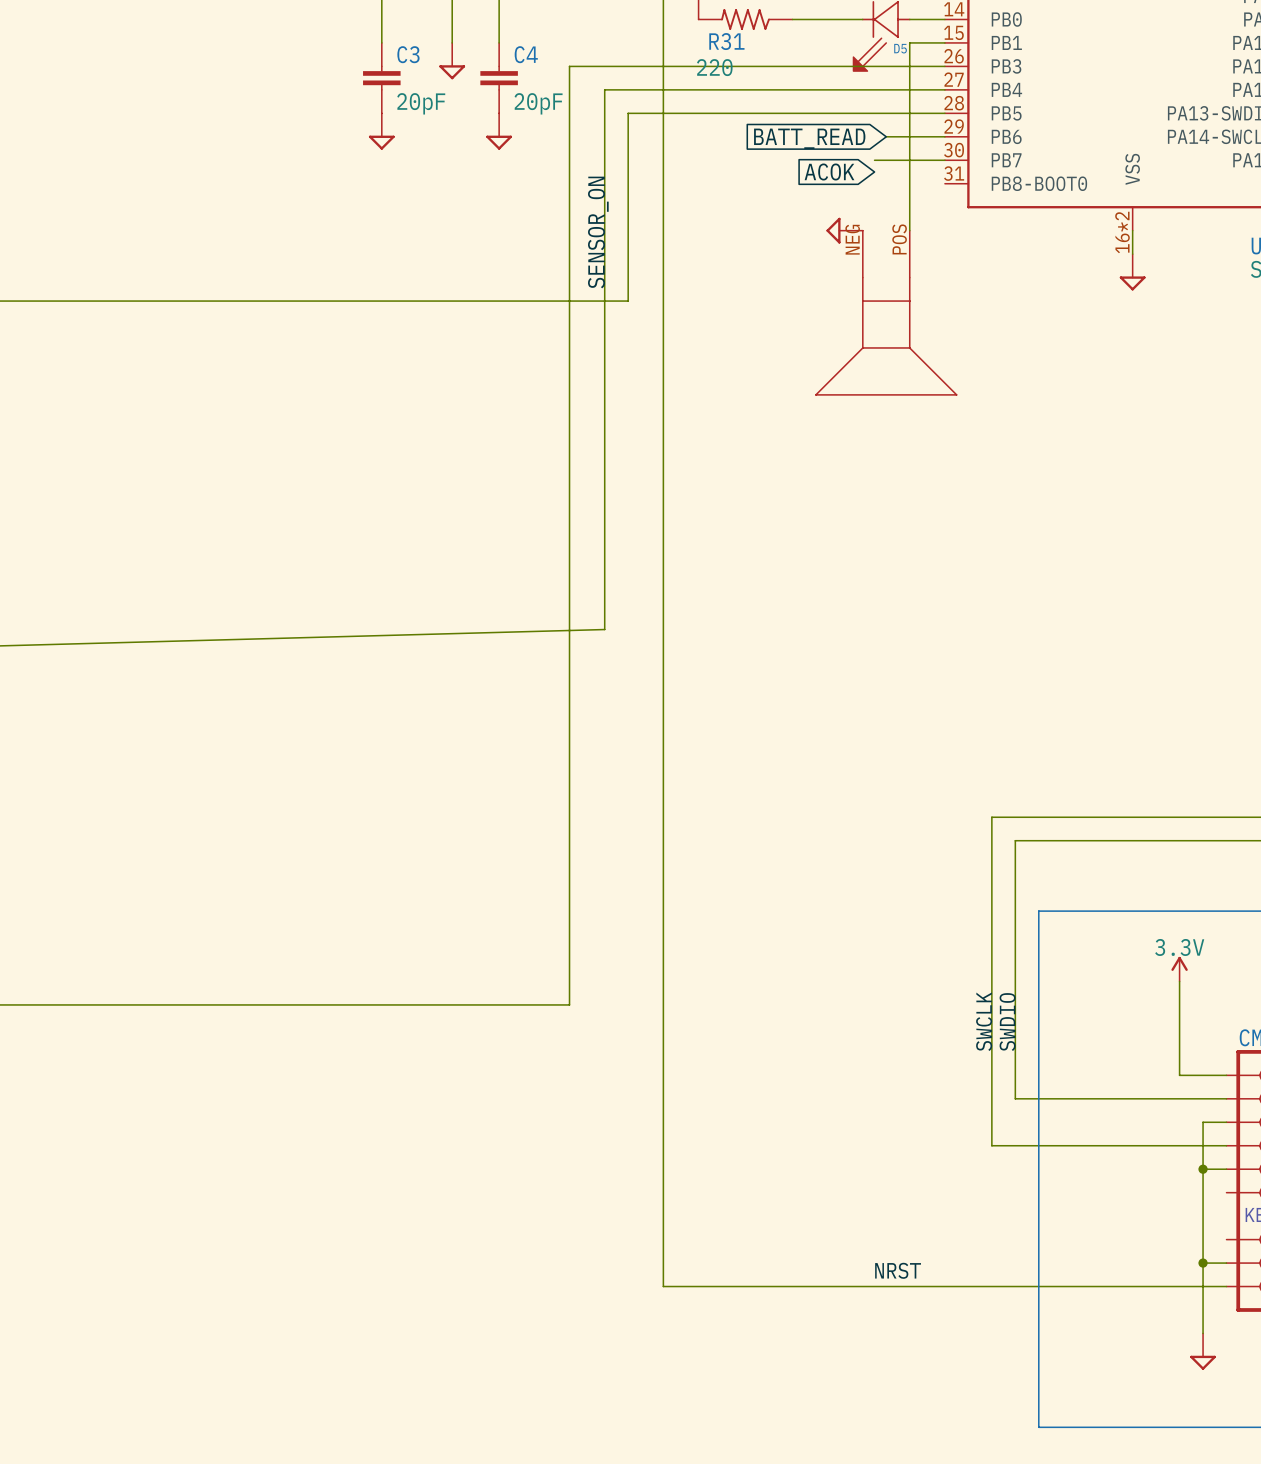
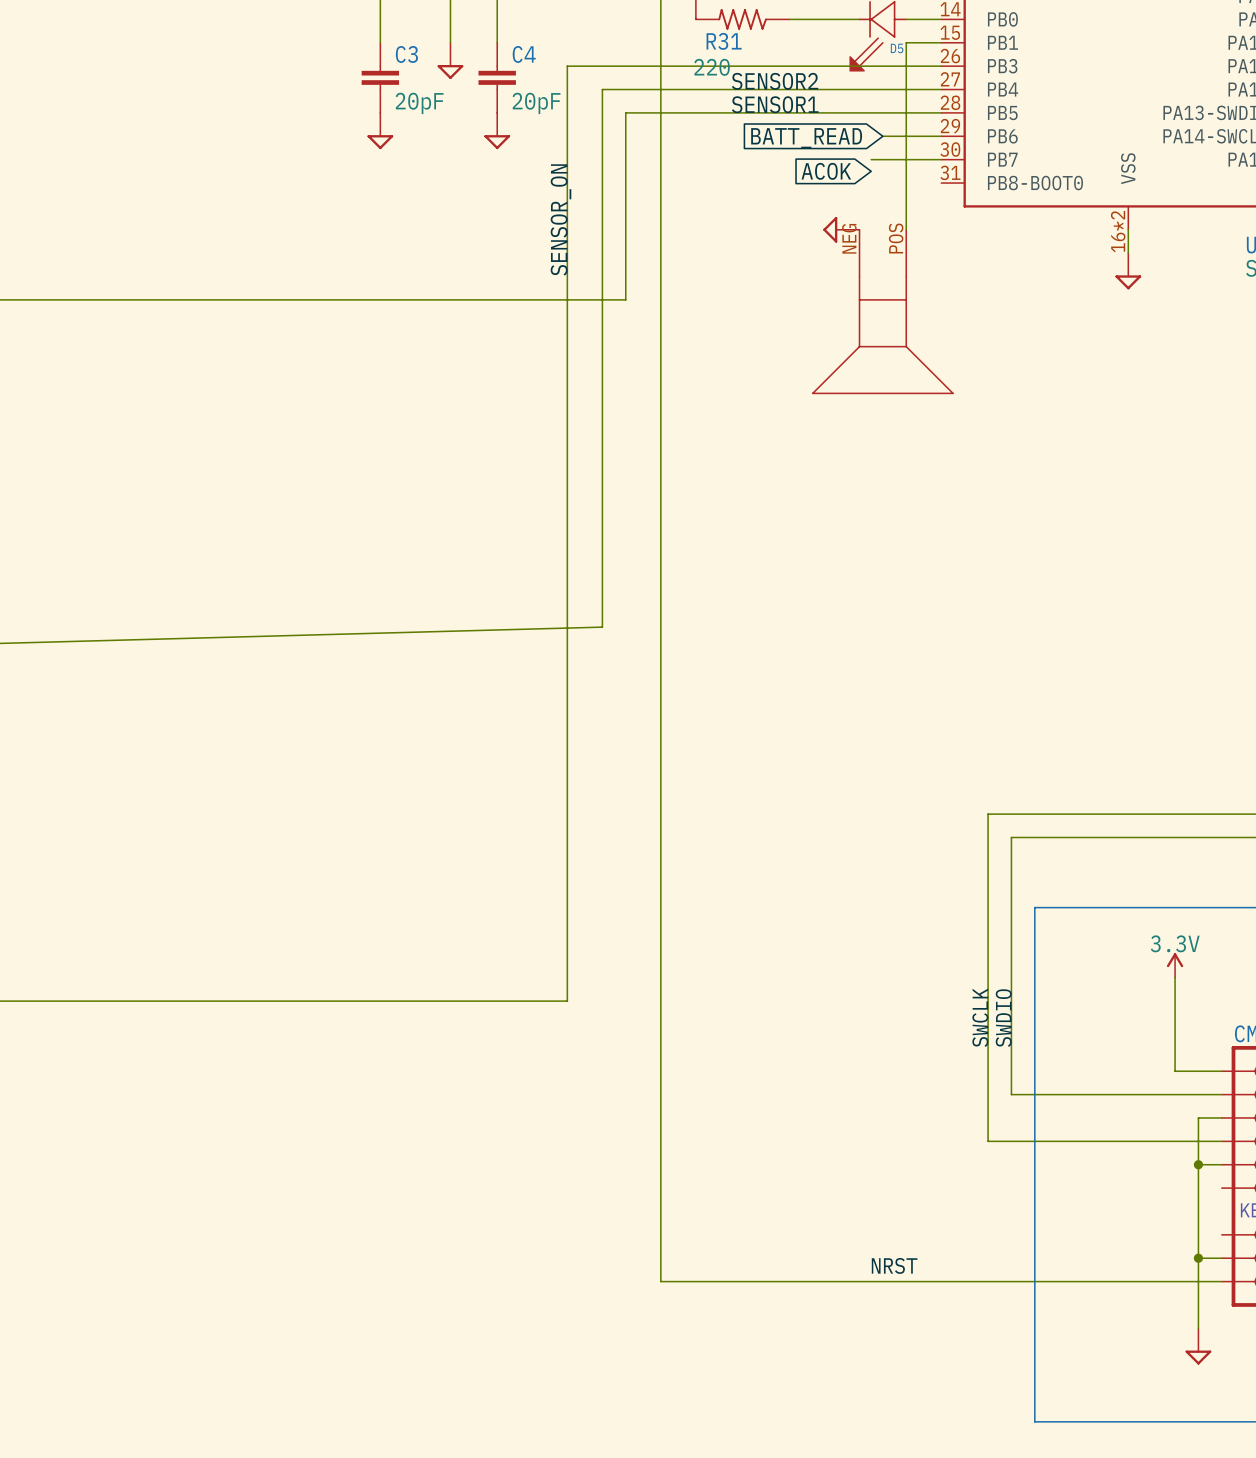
label: none -> SENSOR2 (775, 81)
label: none -> SENSOR1 (775, 104)
label position: SENSOR_ON (598, 232) -> SENSOR_ON (561, 219)

